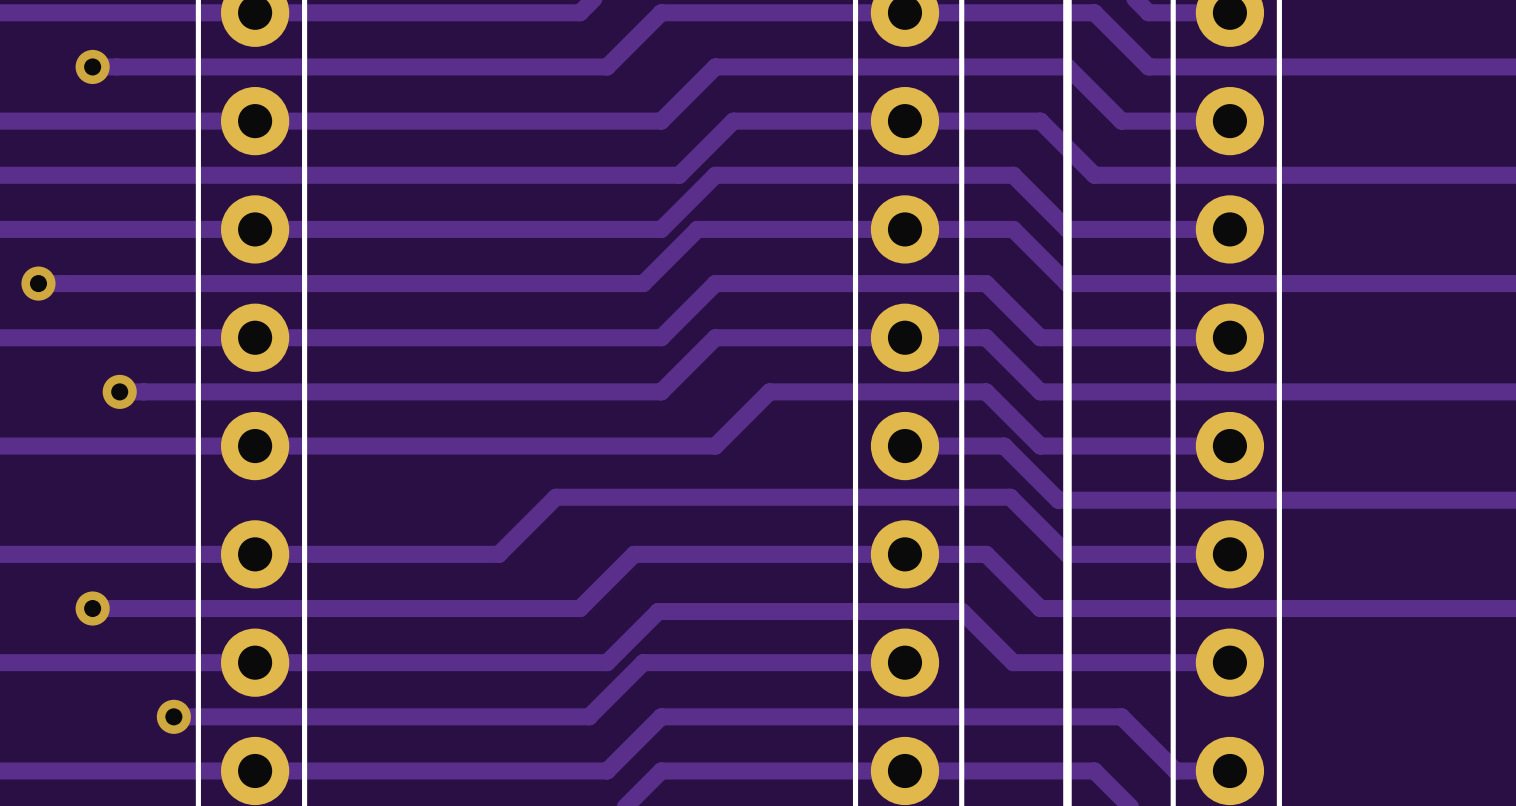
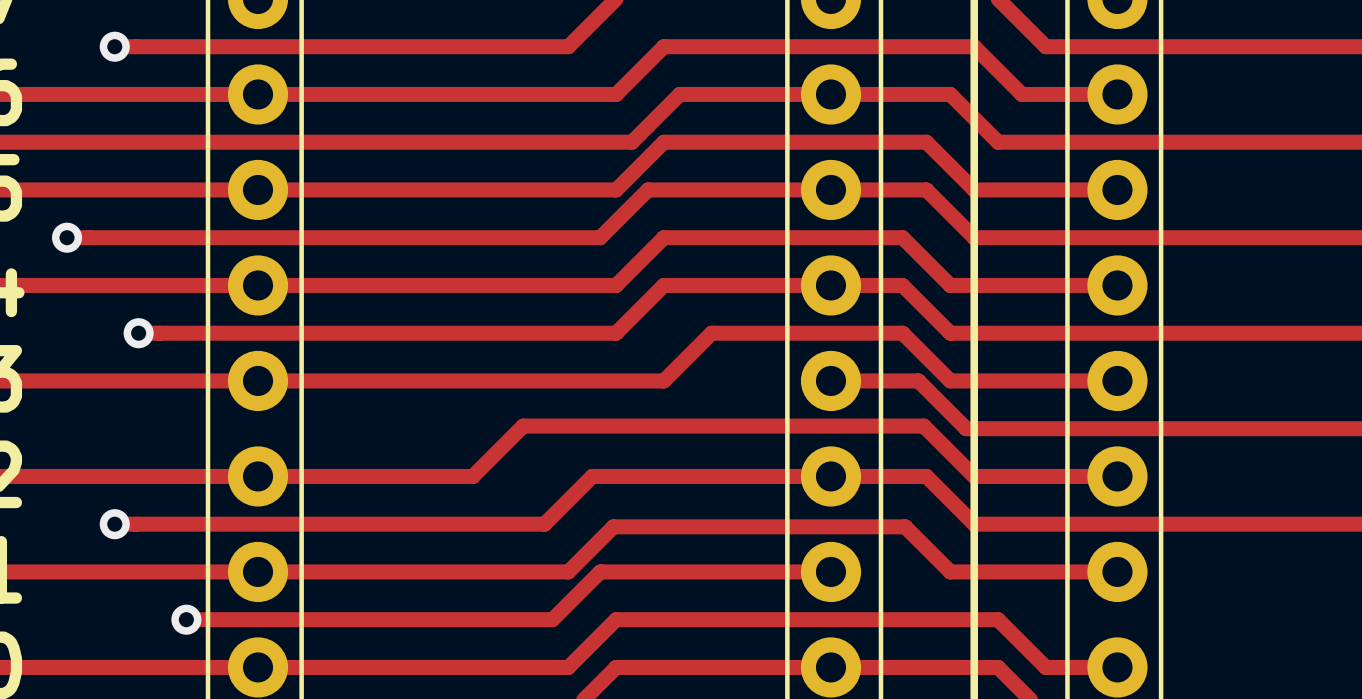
track: (986, 554) (1040, 608) (1067, 608) -> (902, 476) (926, 476) (974, 524)
track: (962, 611) (1013, 662) (1040, 662) -> (881, 526) (905, 526) (950, 571)
track: (1094, 716) (1121, 716) (1175, 770) -> (998, 619) (1045, 667) (1069, 667)

